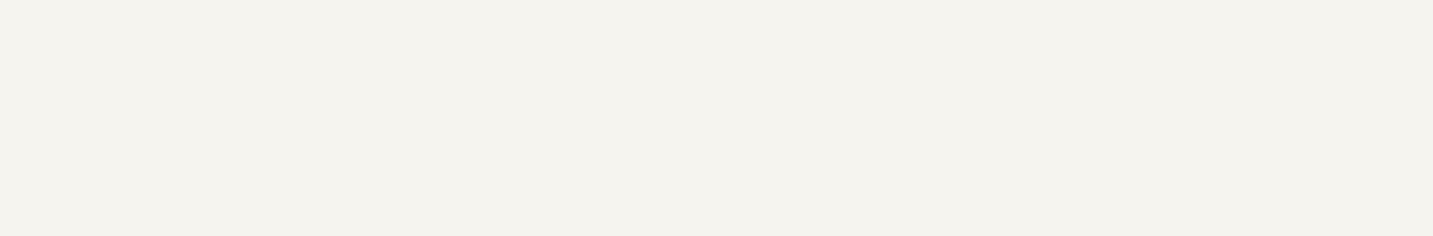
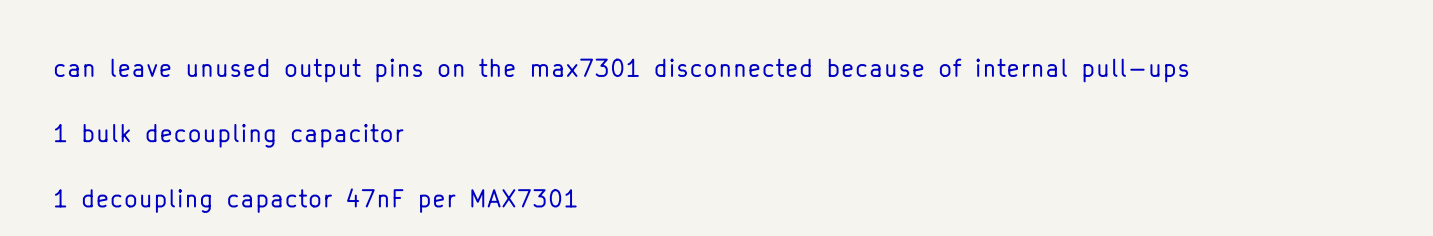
text: none -> can leave unused output pins on the max7301 disconnected because of internal pull-ups (621, 70)
text: none -> 1 bulk decoupling capacitor (229, 135)
text: none -> 1 decoupling capactor 47nF per MAX7301 (315, 200)

